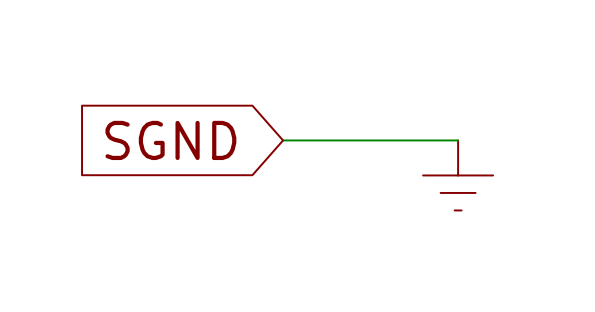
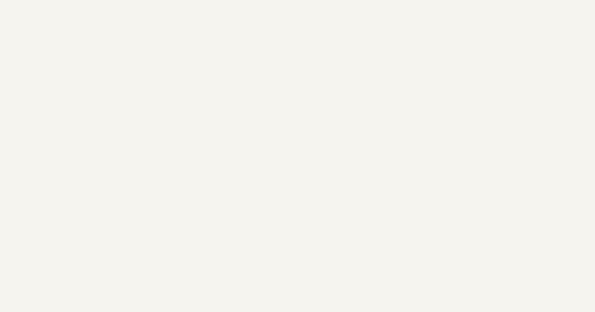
global label: SGND (170, 140) -> none
wire: (283, 140) (458, 140) -> none
power symbol: (458, 175) -> none

